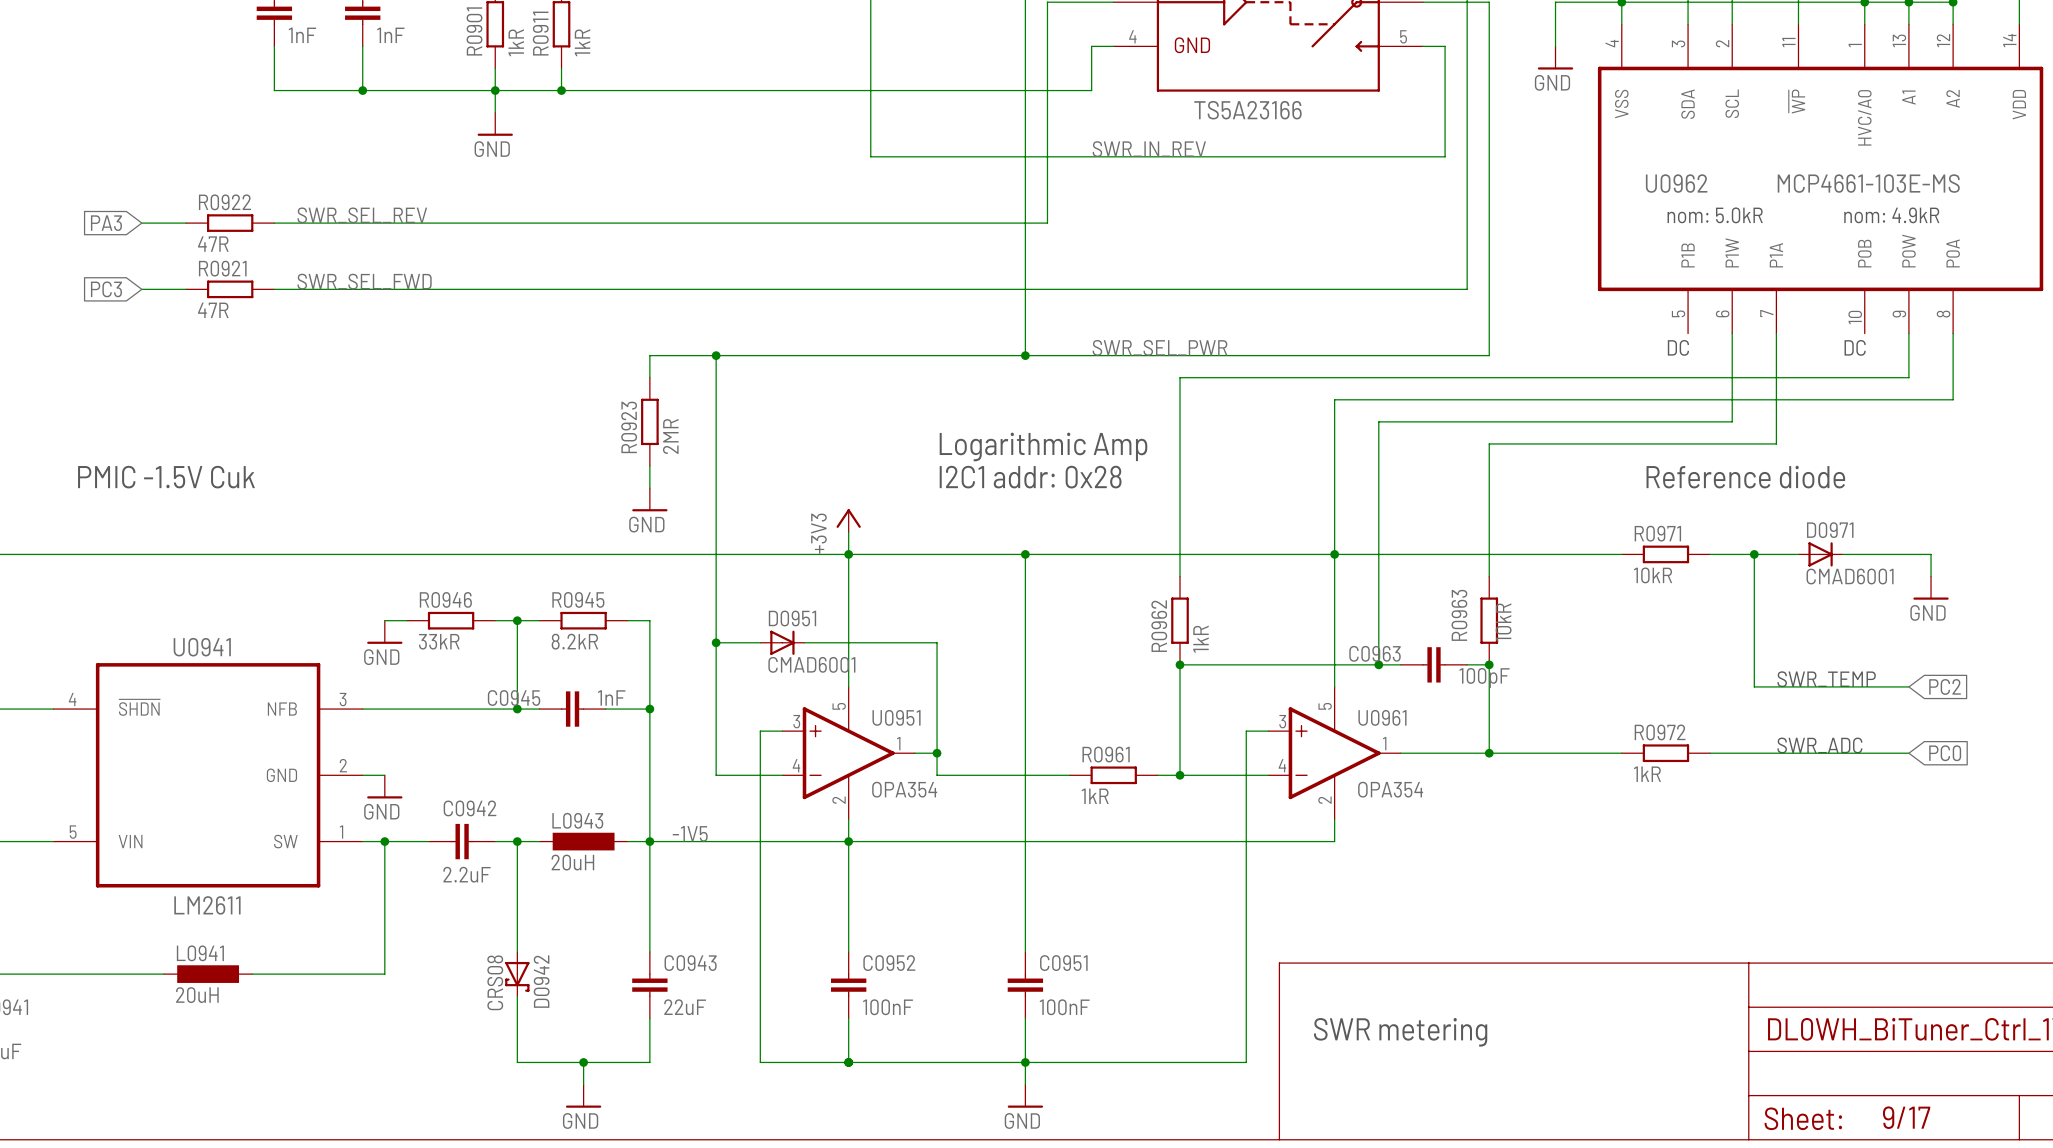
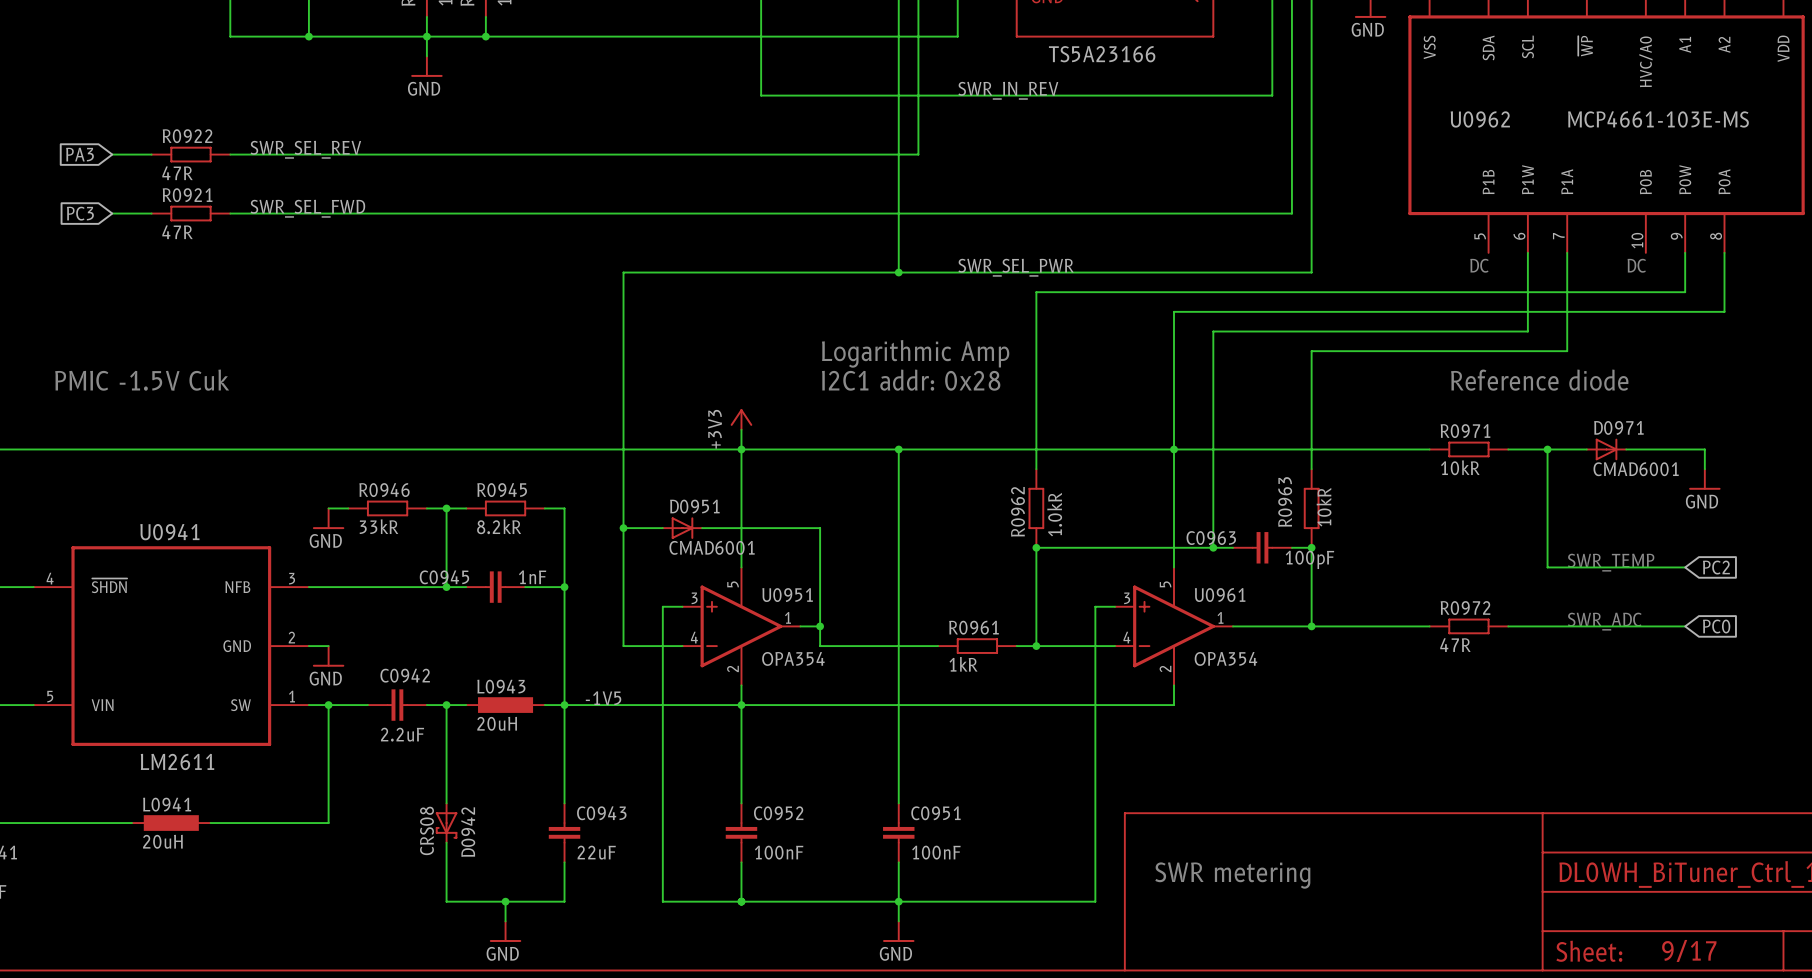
text: nom: 5.0kR (1715, 215) -> none
text: nom: 4.9kR (1891, 215) -> none
wire: (716, 355) (649, 355) (649, 377) -> none
junction: (716, 355) -> none
R0923: 2MR (649, 421) -> none
wire: (649, 466) (649, 488) -> none
power symbol: GND (649, 499) -> none
R0962 value: 1kR (1200, 639) -> 1.0kR (1054, 514)
R0972 value: 1kR (1647, 774) -> 47R (1455, 645)

